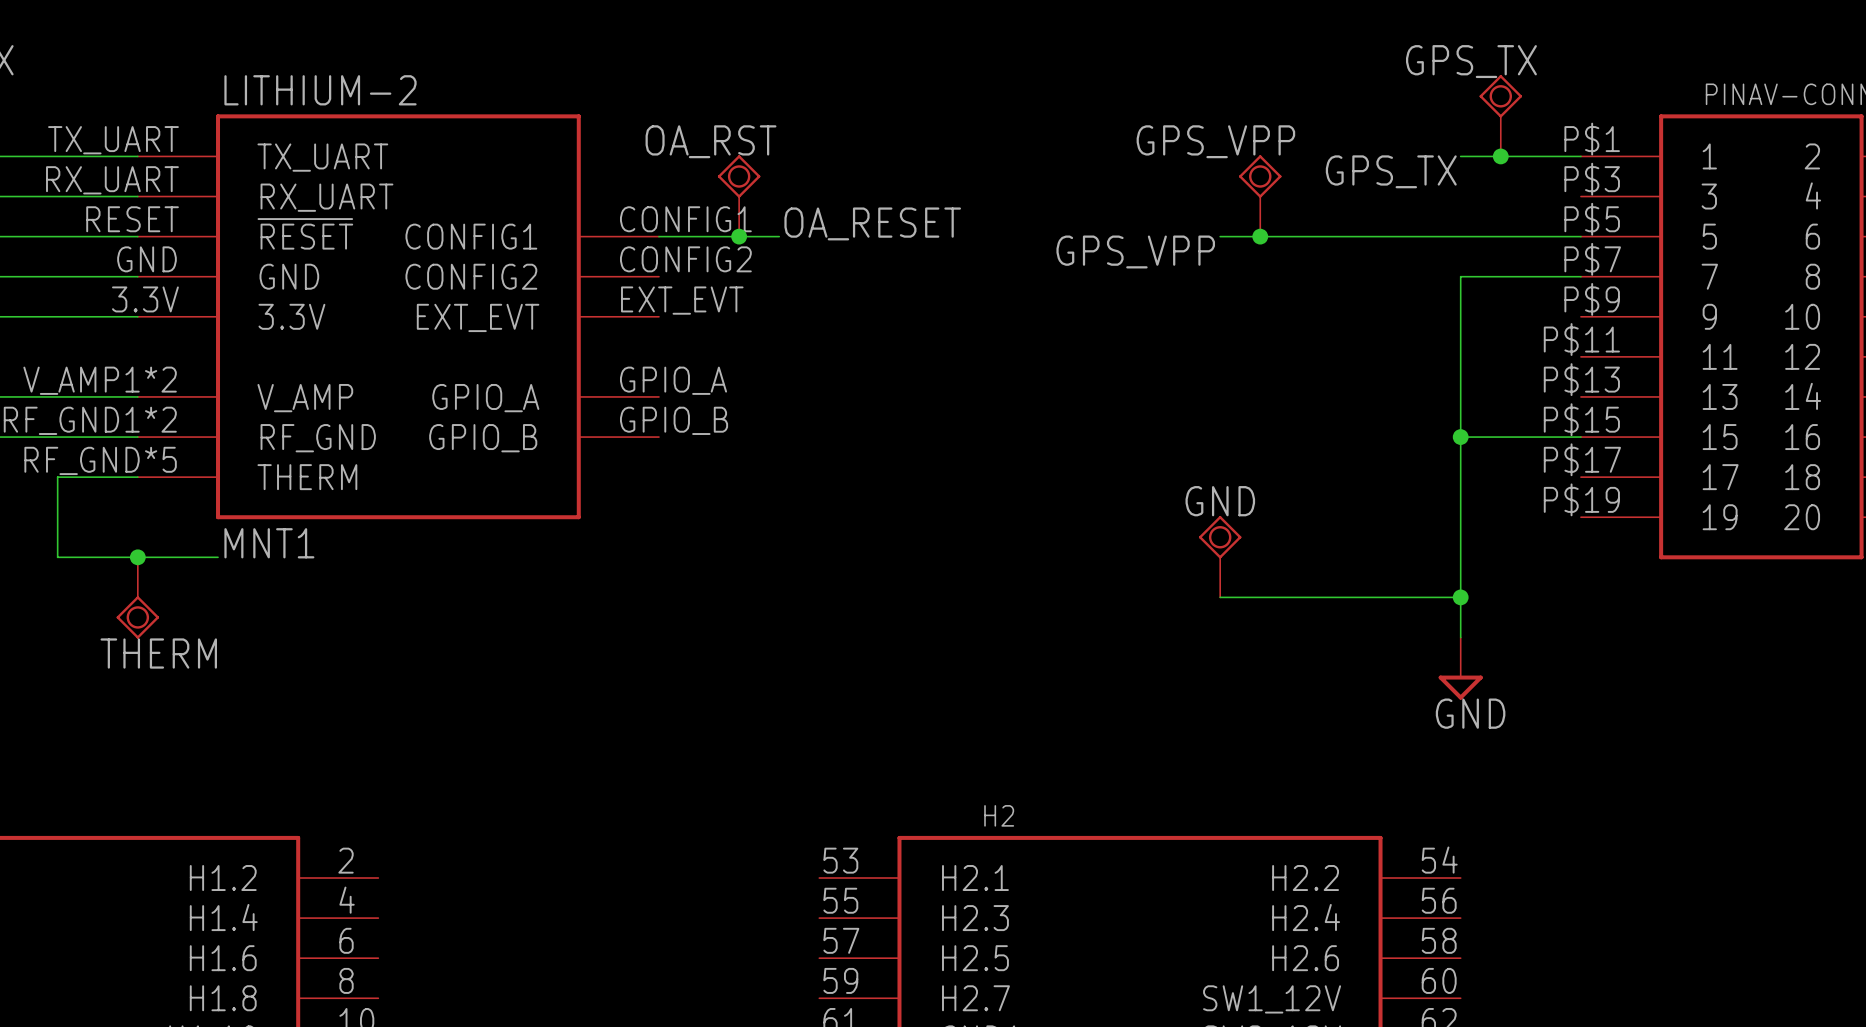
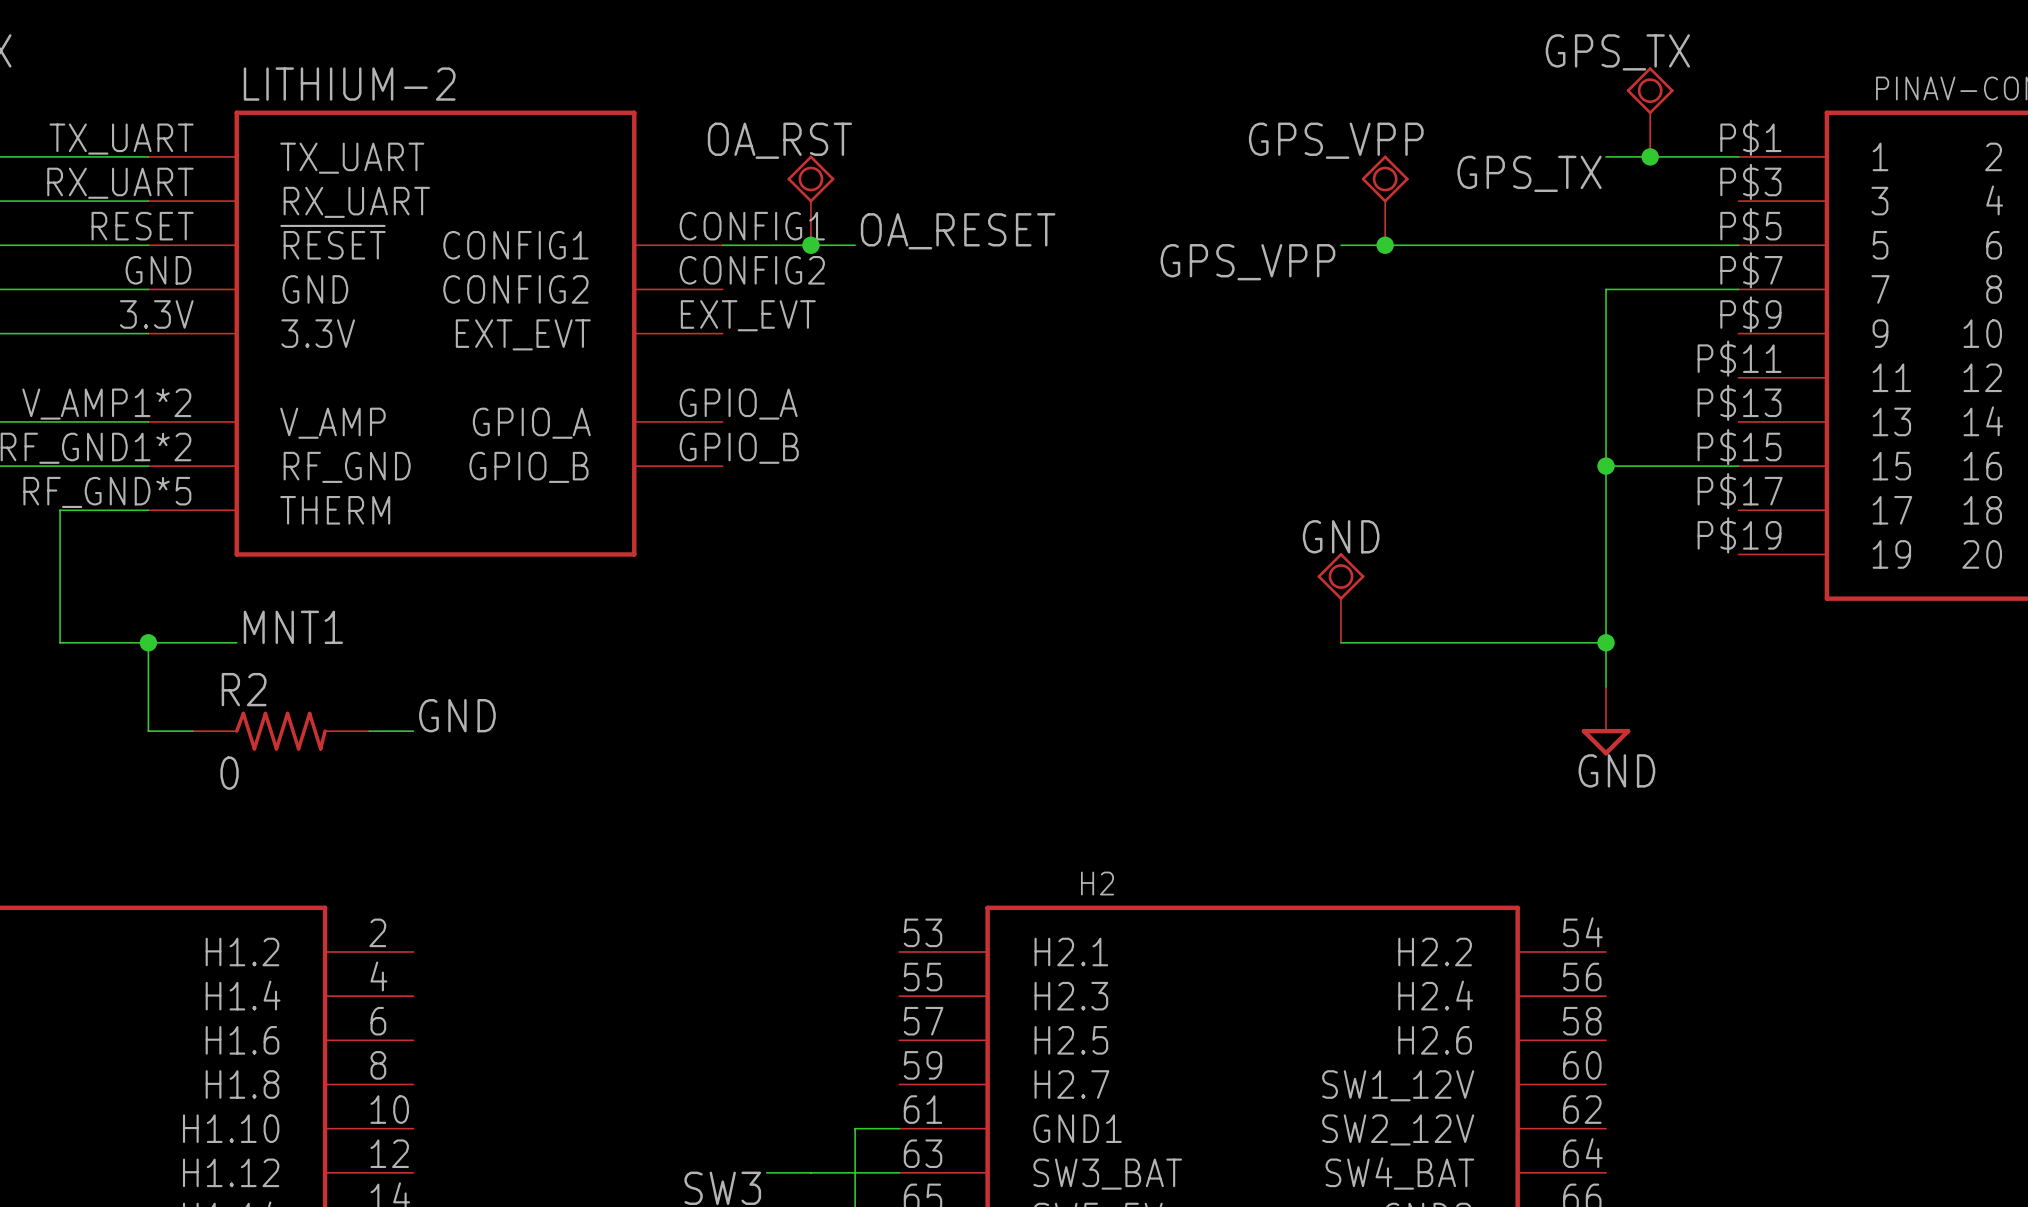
label position: MNT1 (269, 543) -> MNT1 (293, 627)
wire: (57, 557) (218, 557) -> (60, 598) (60, 642) (236, 642)
junction position: (137, 557) -> (148, 642)
wire: none -> (148, 642) (148, 731) (192, 731)
THERM: (137, 598) -> none
label: none -> GND (457, 715)
R2: none -> 0 (280, 731)
wire: none -> (369, 731) (413, 731)

